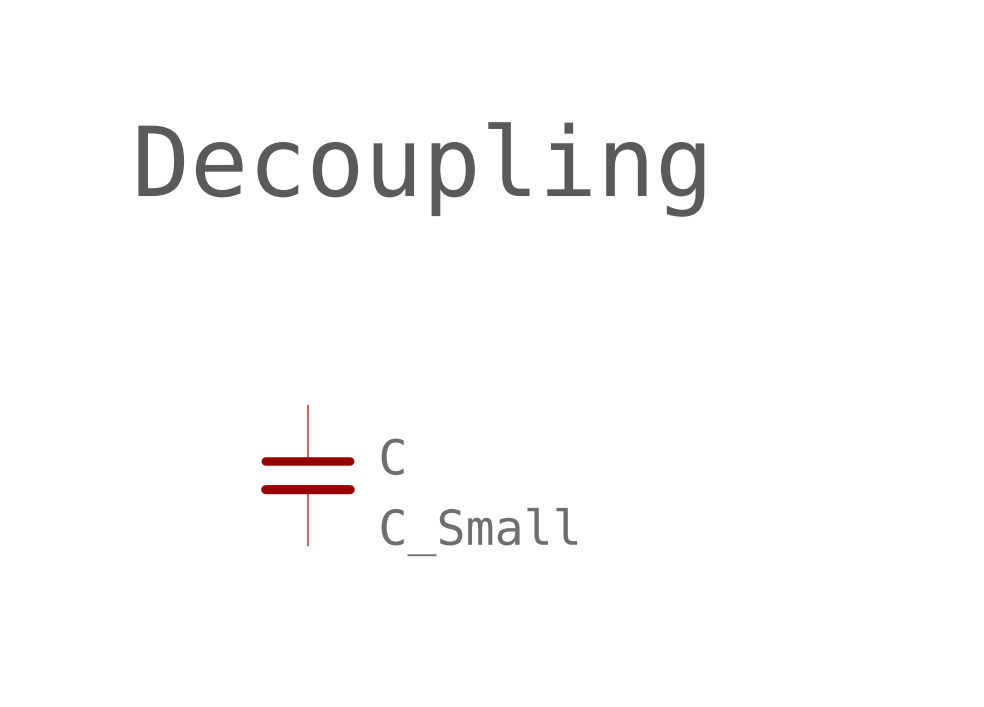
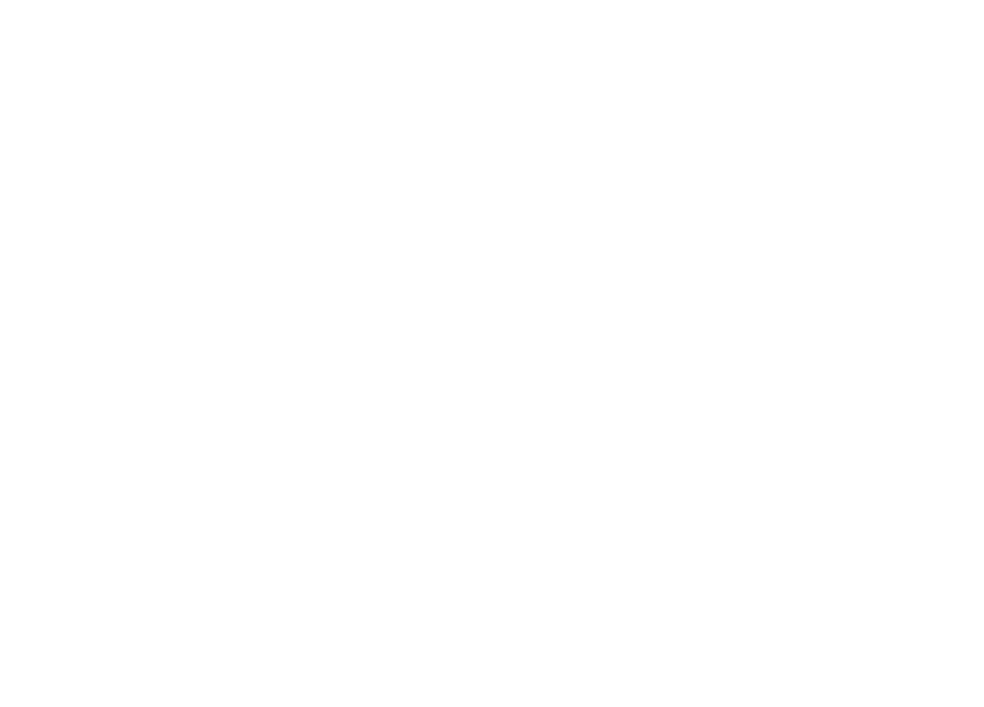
text: Decoupling (421, 169) -> none
C: C_Small (307, 475) -> none

